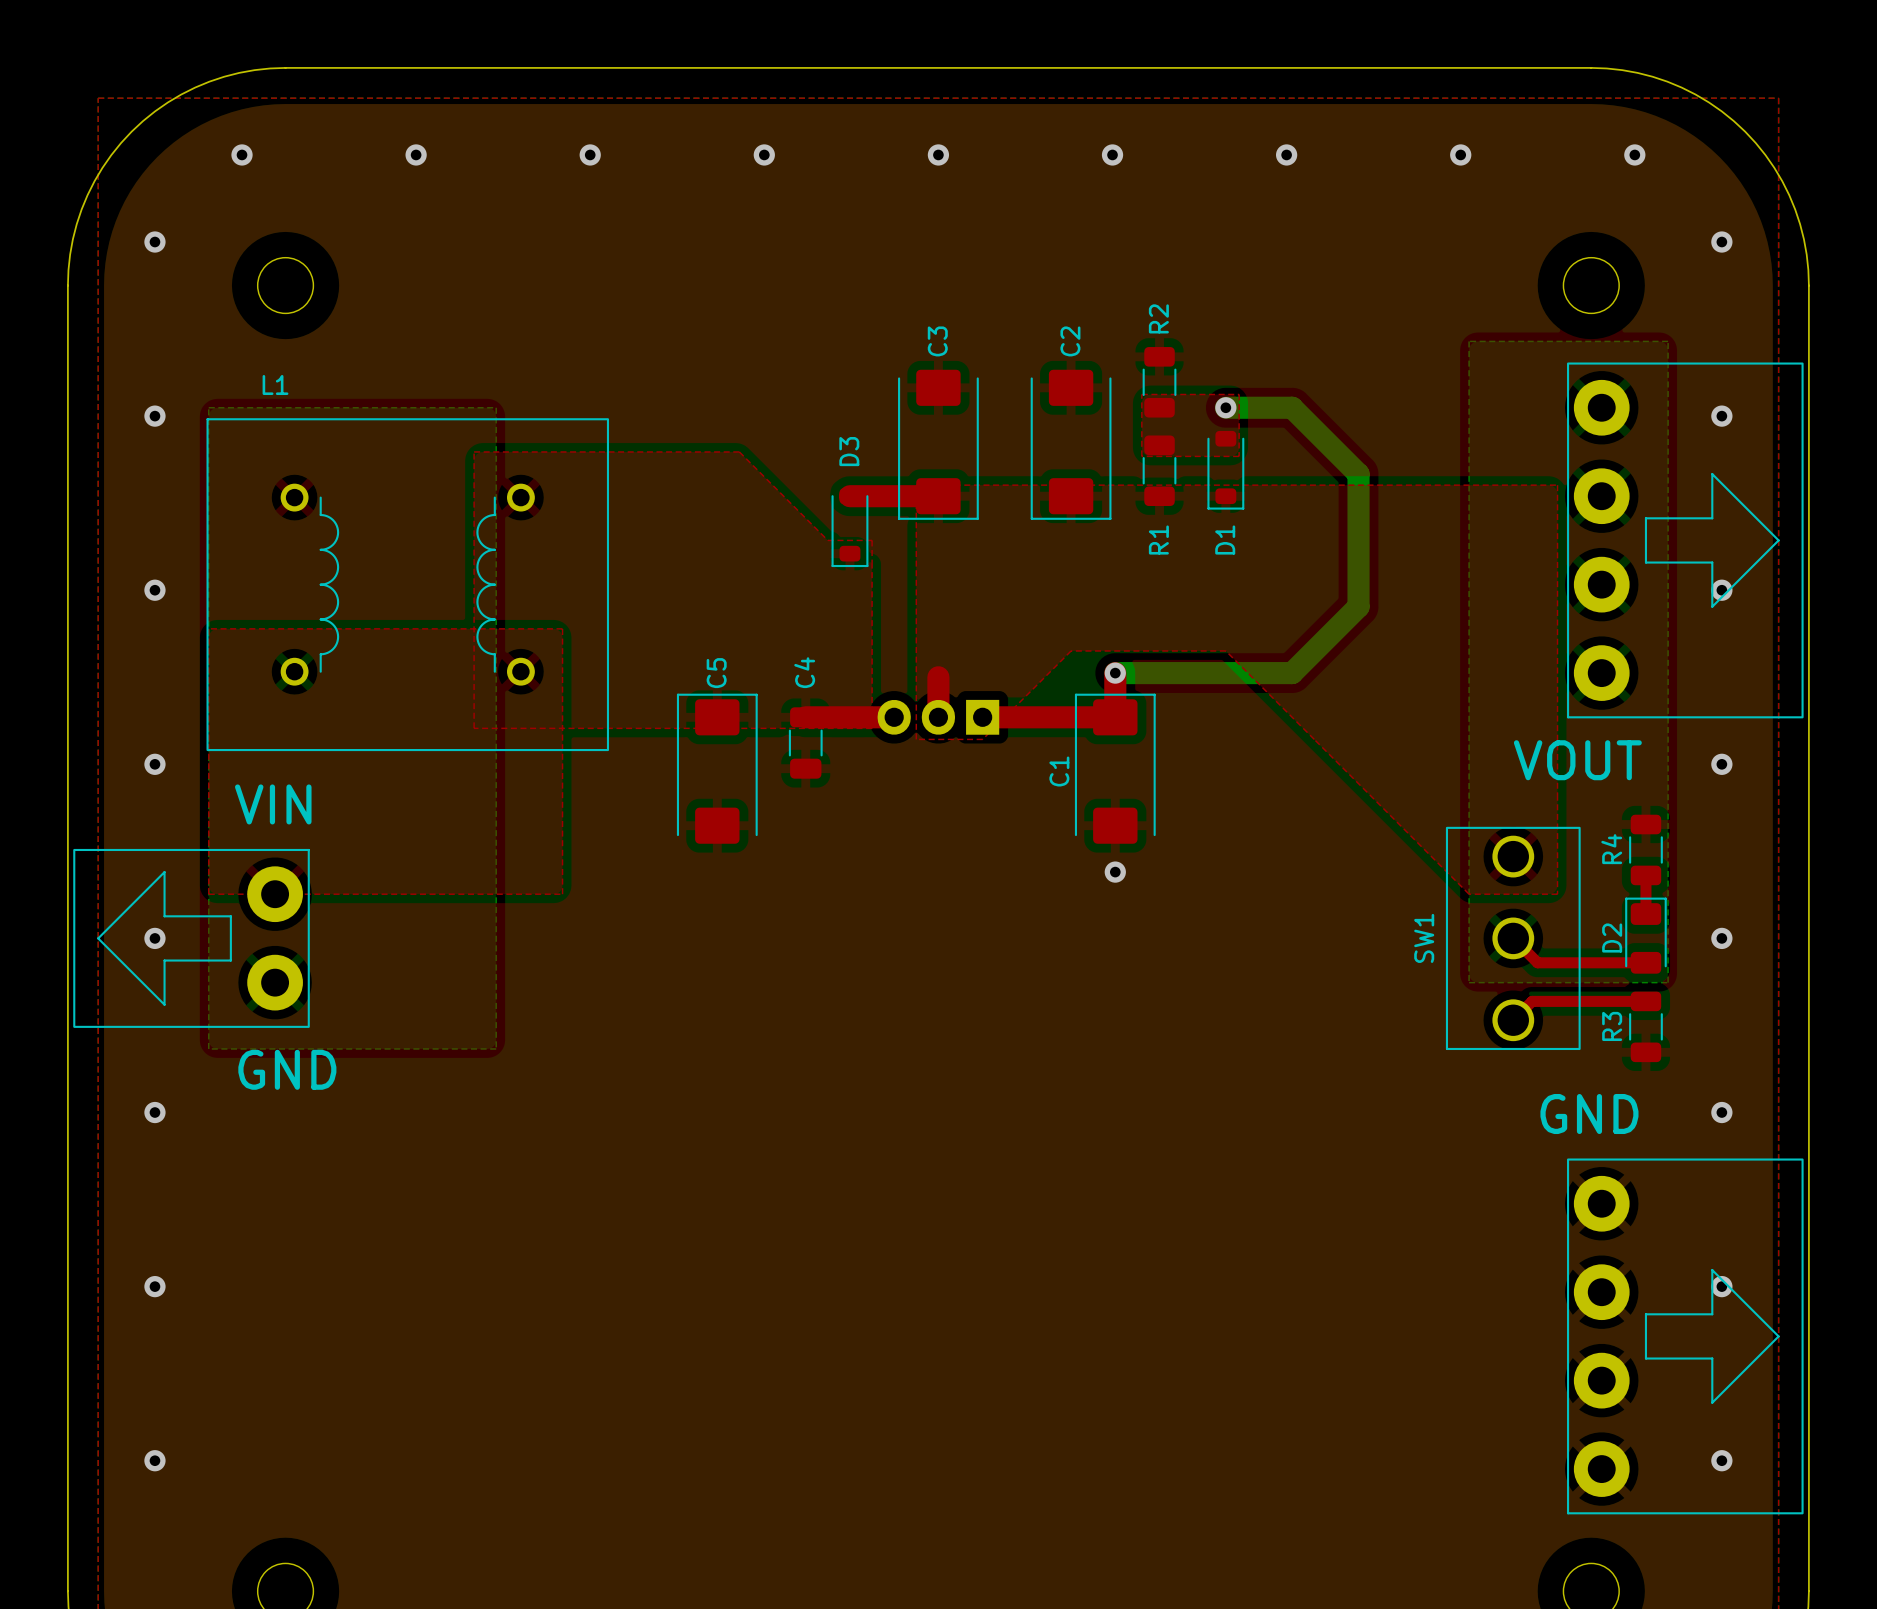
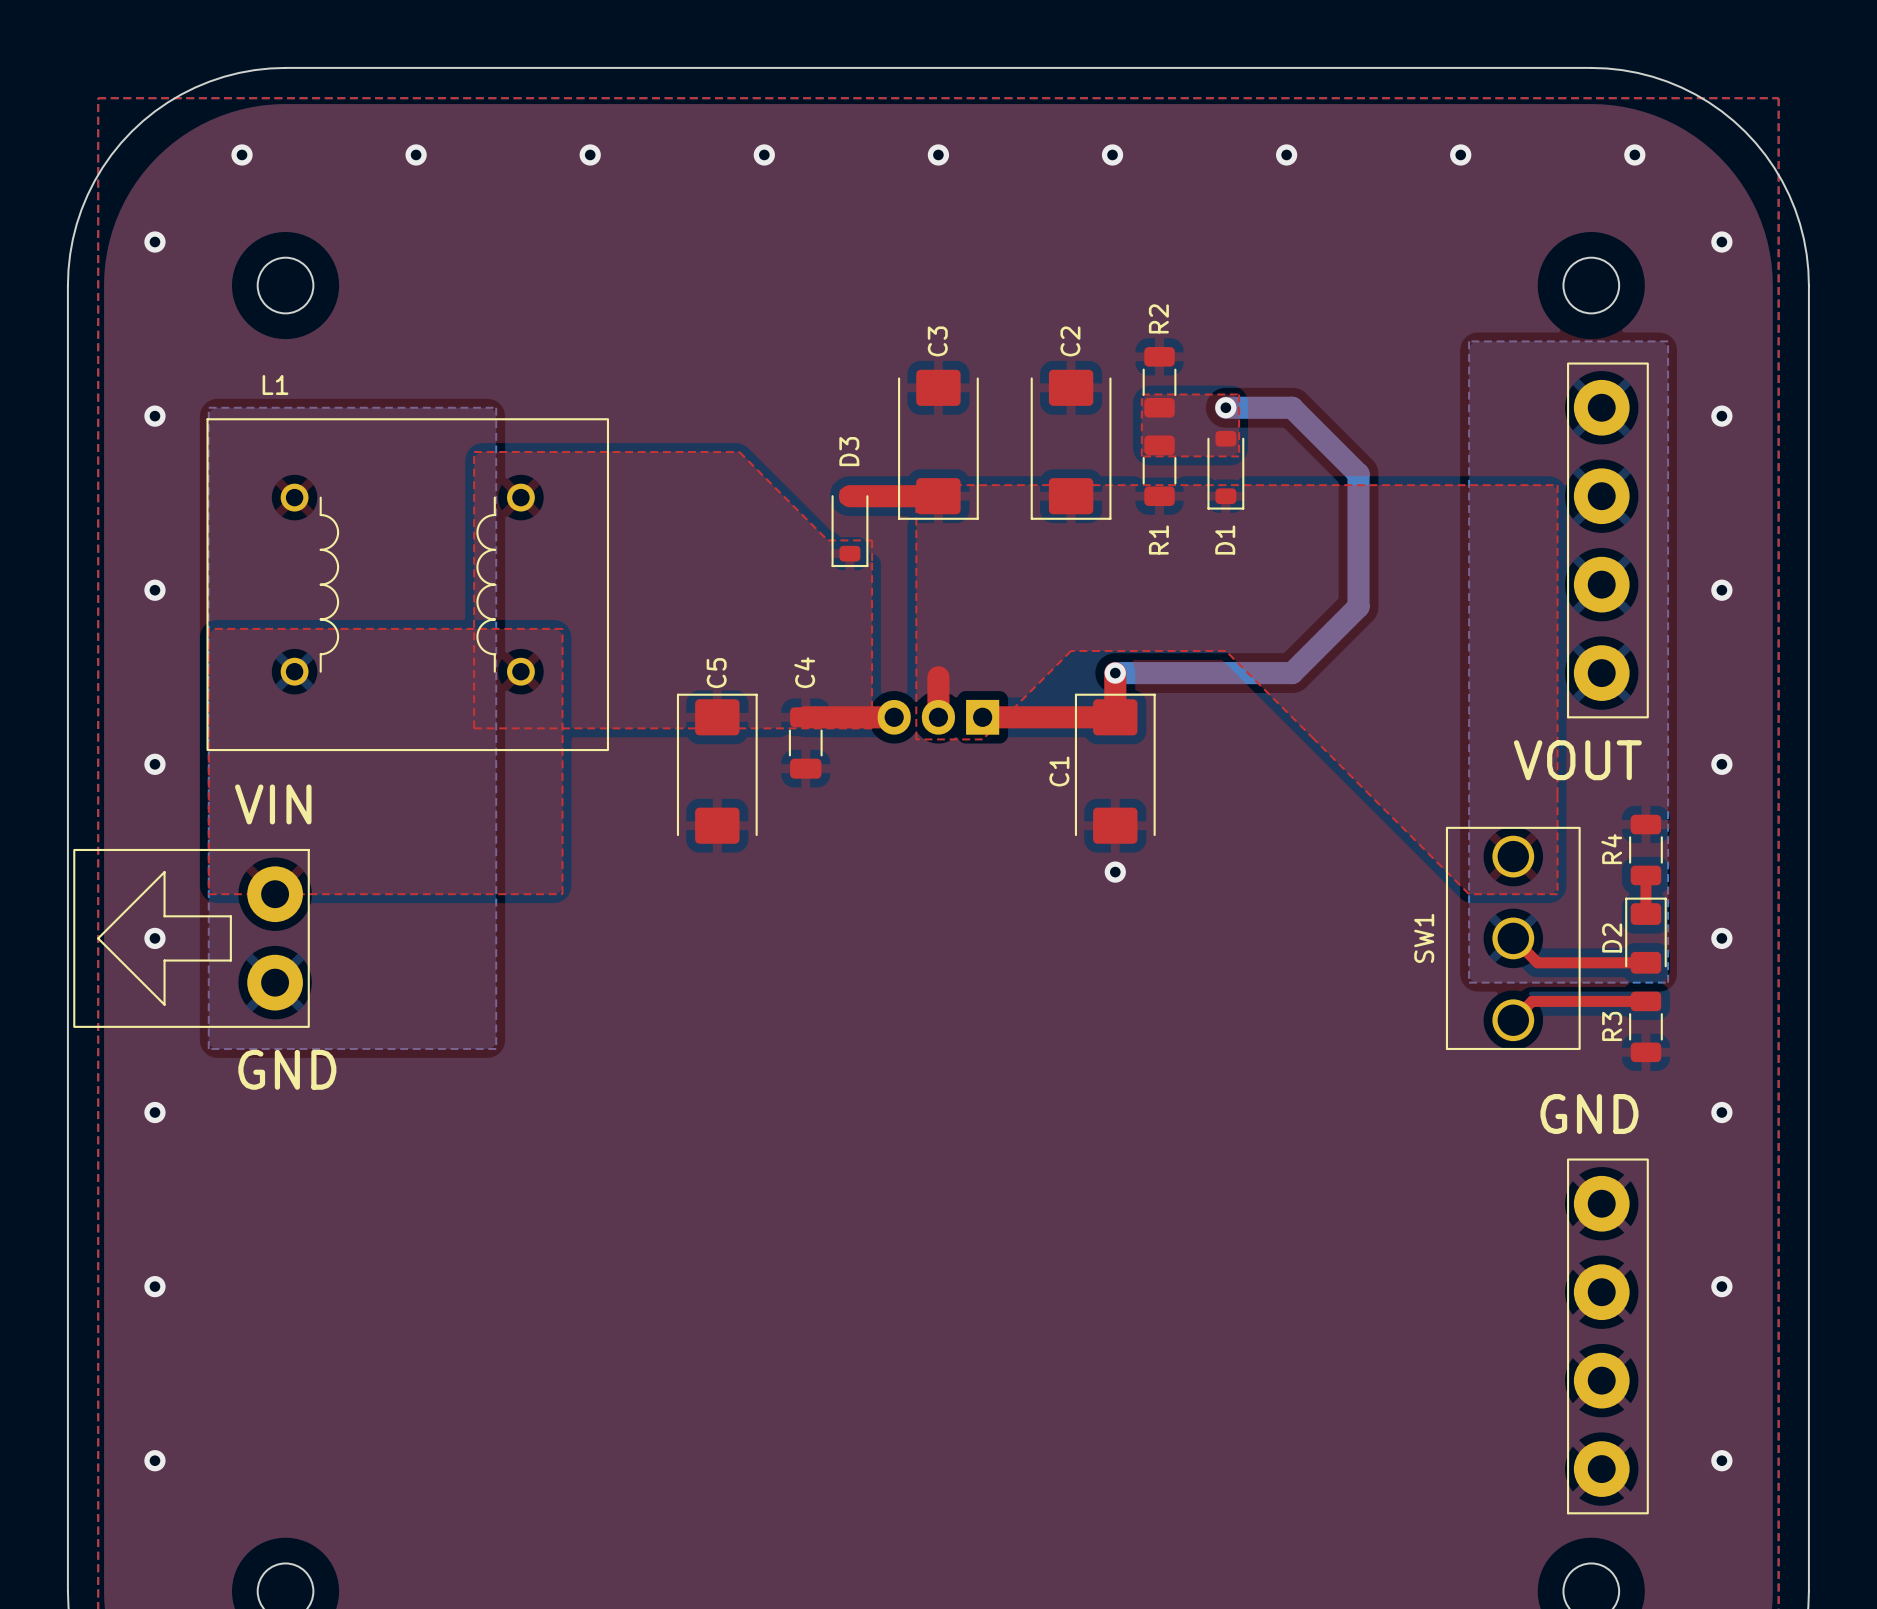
part: none -> (1607, 540)
part: (1685, 540) -> none
part: none -> (1607, 1336)
part: (1685, 1336) -> none

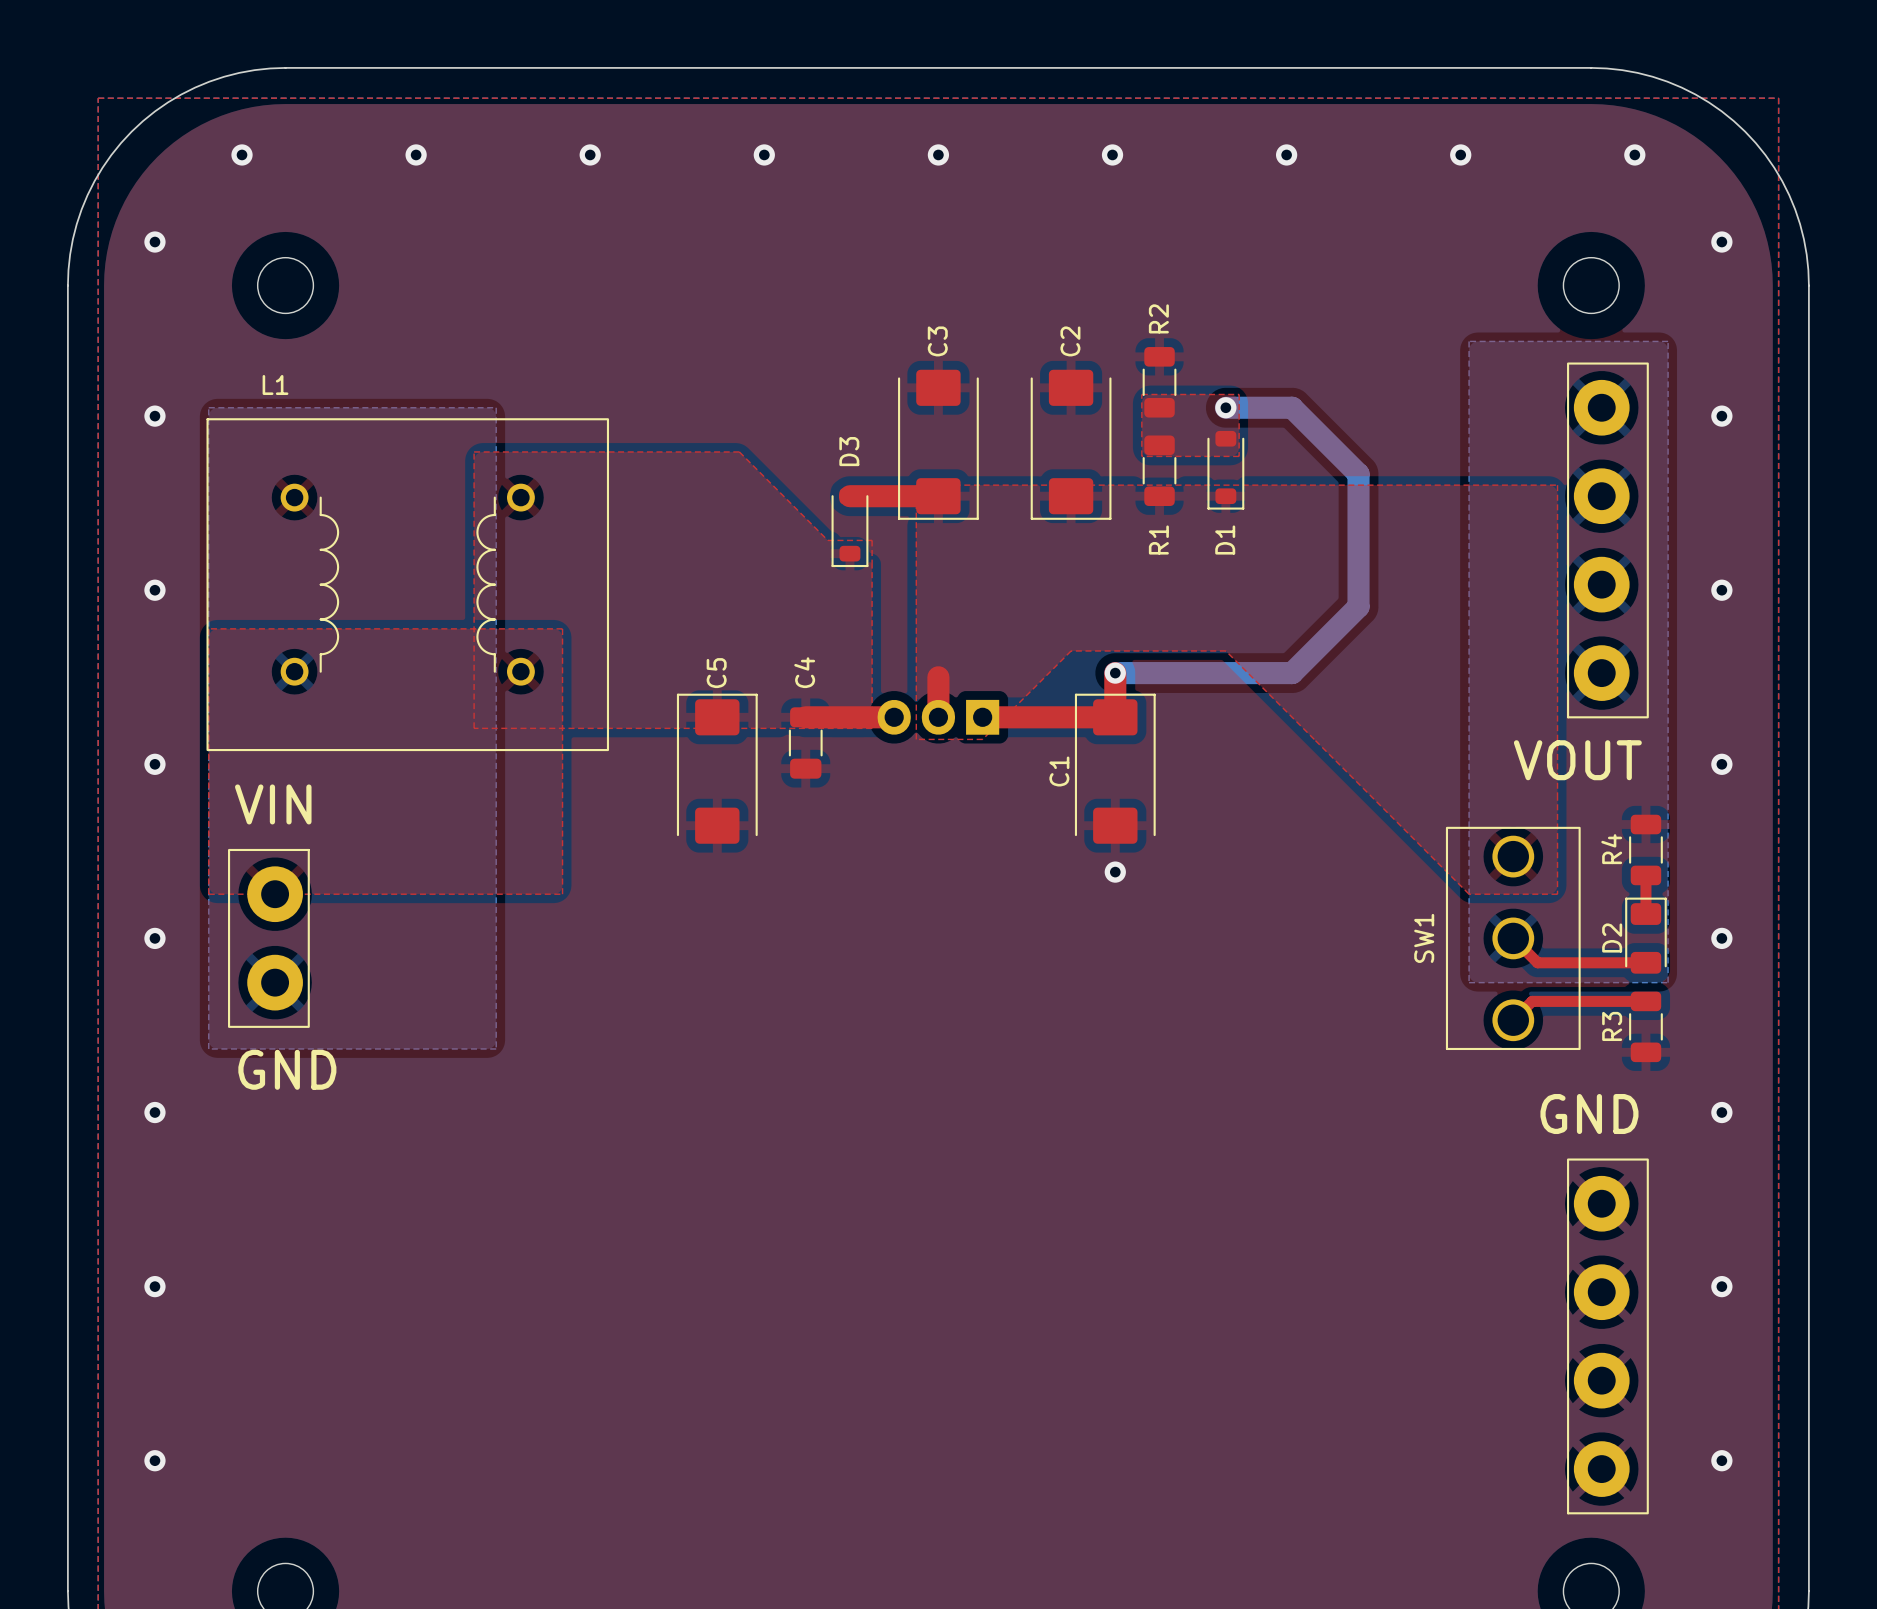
part: (191, 938) -> none
part: none -> (268, 938)

